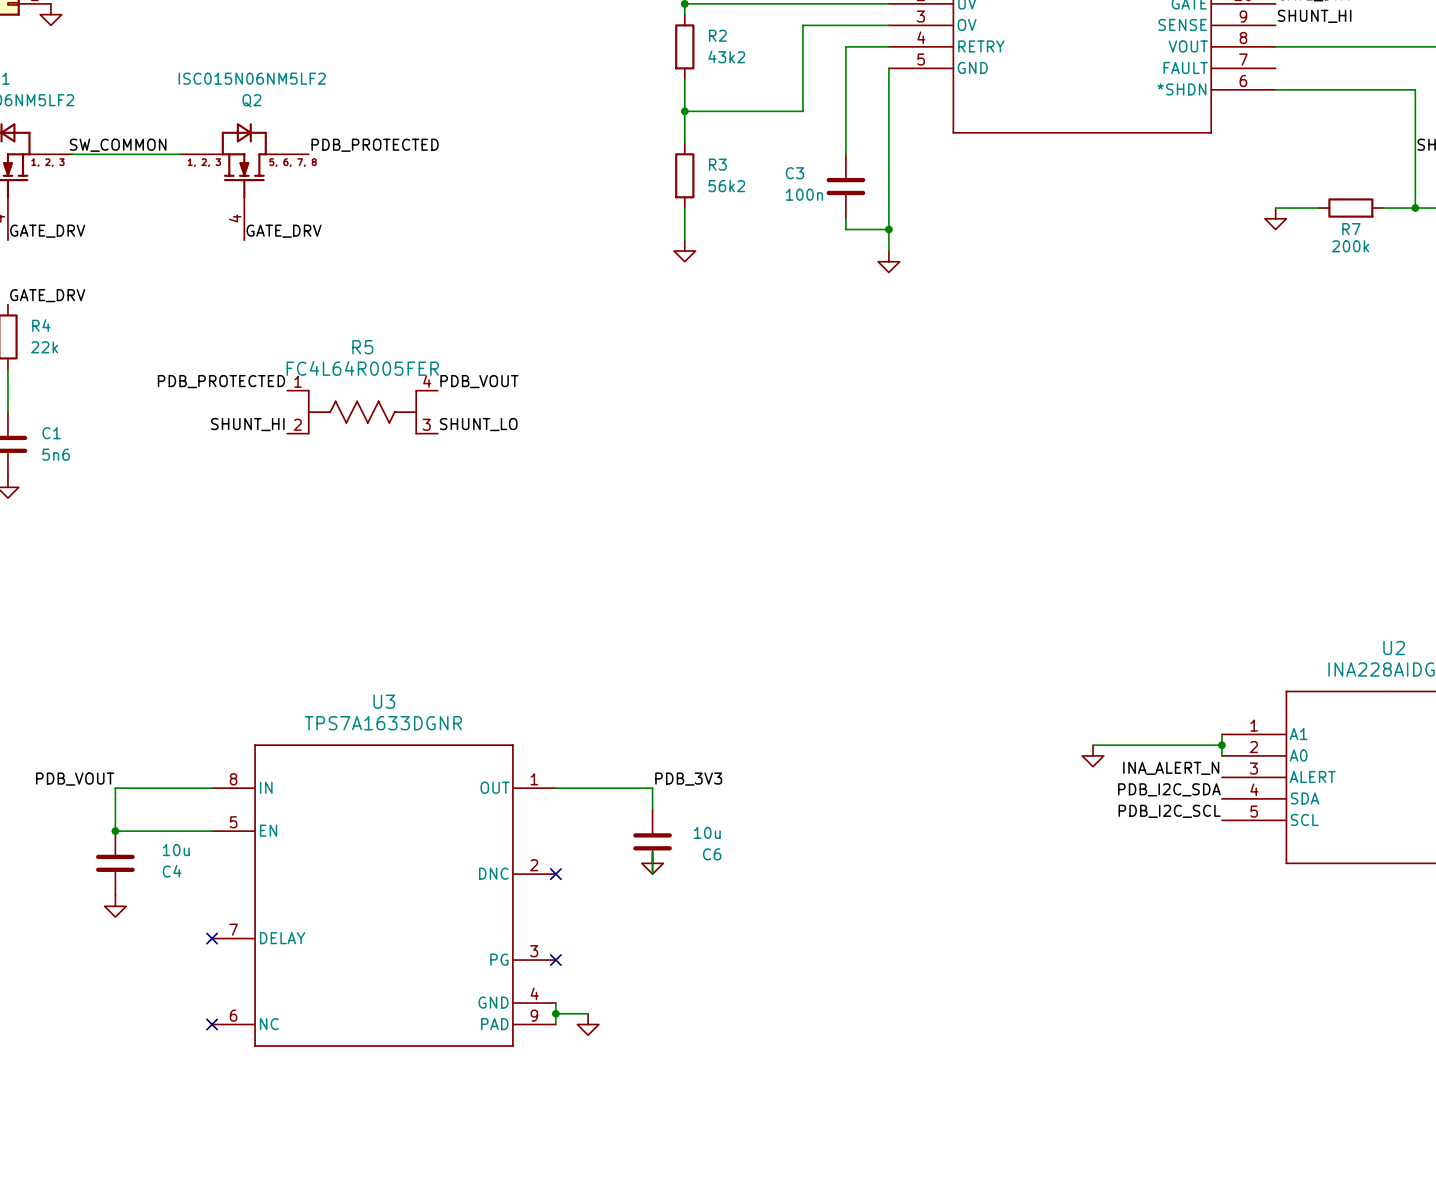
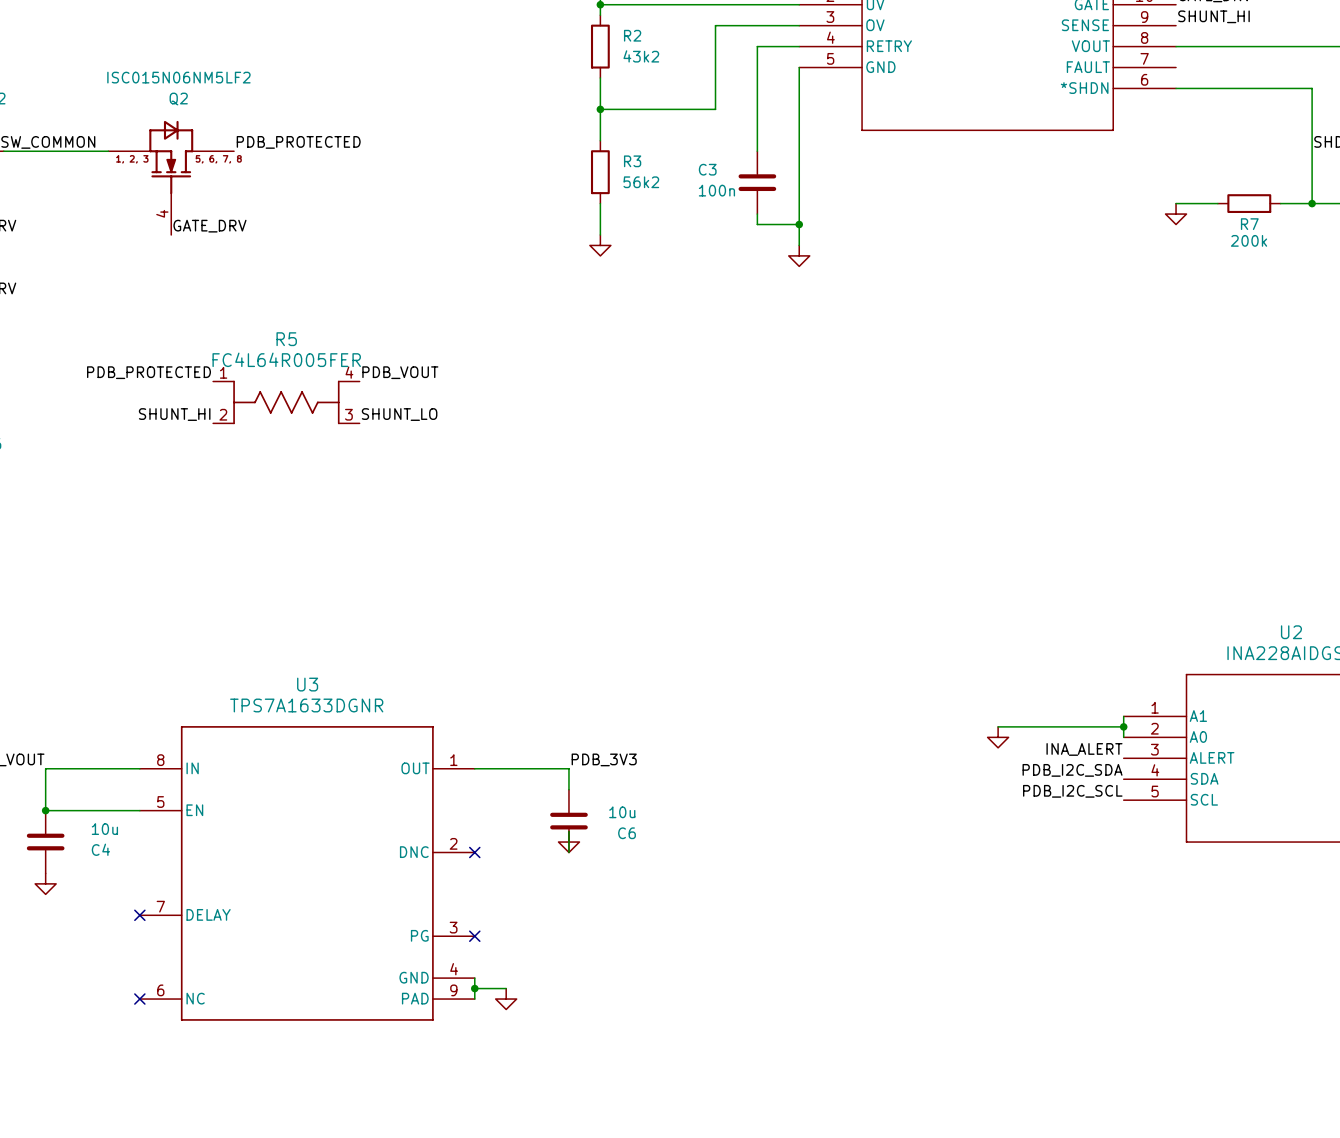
label: INA_ALERT_N (1171, 768) -> INA_ALERT (1084, 749)

